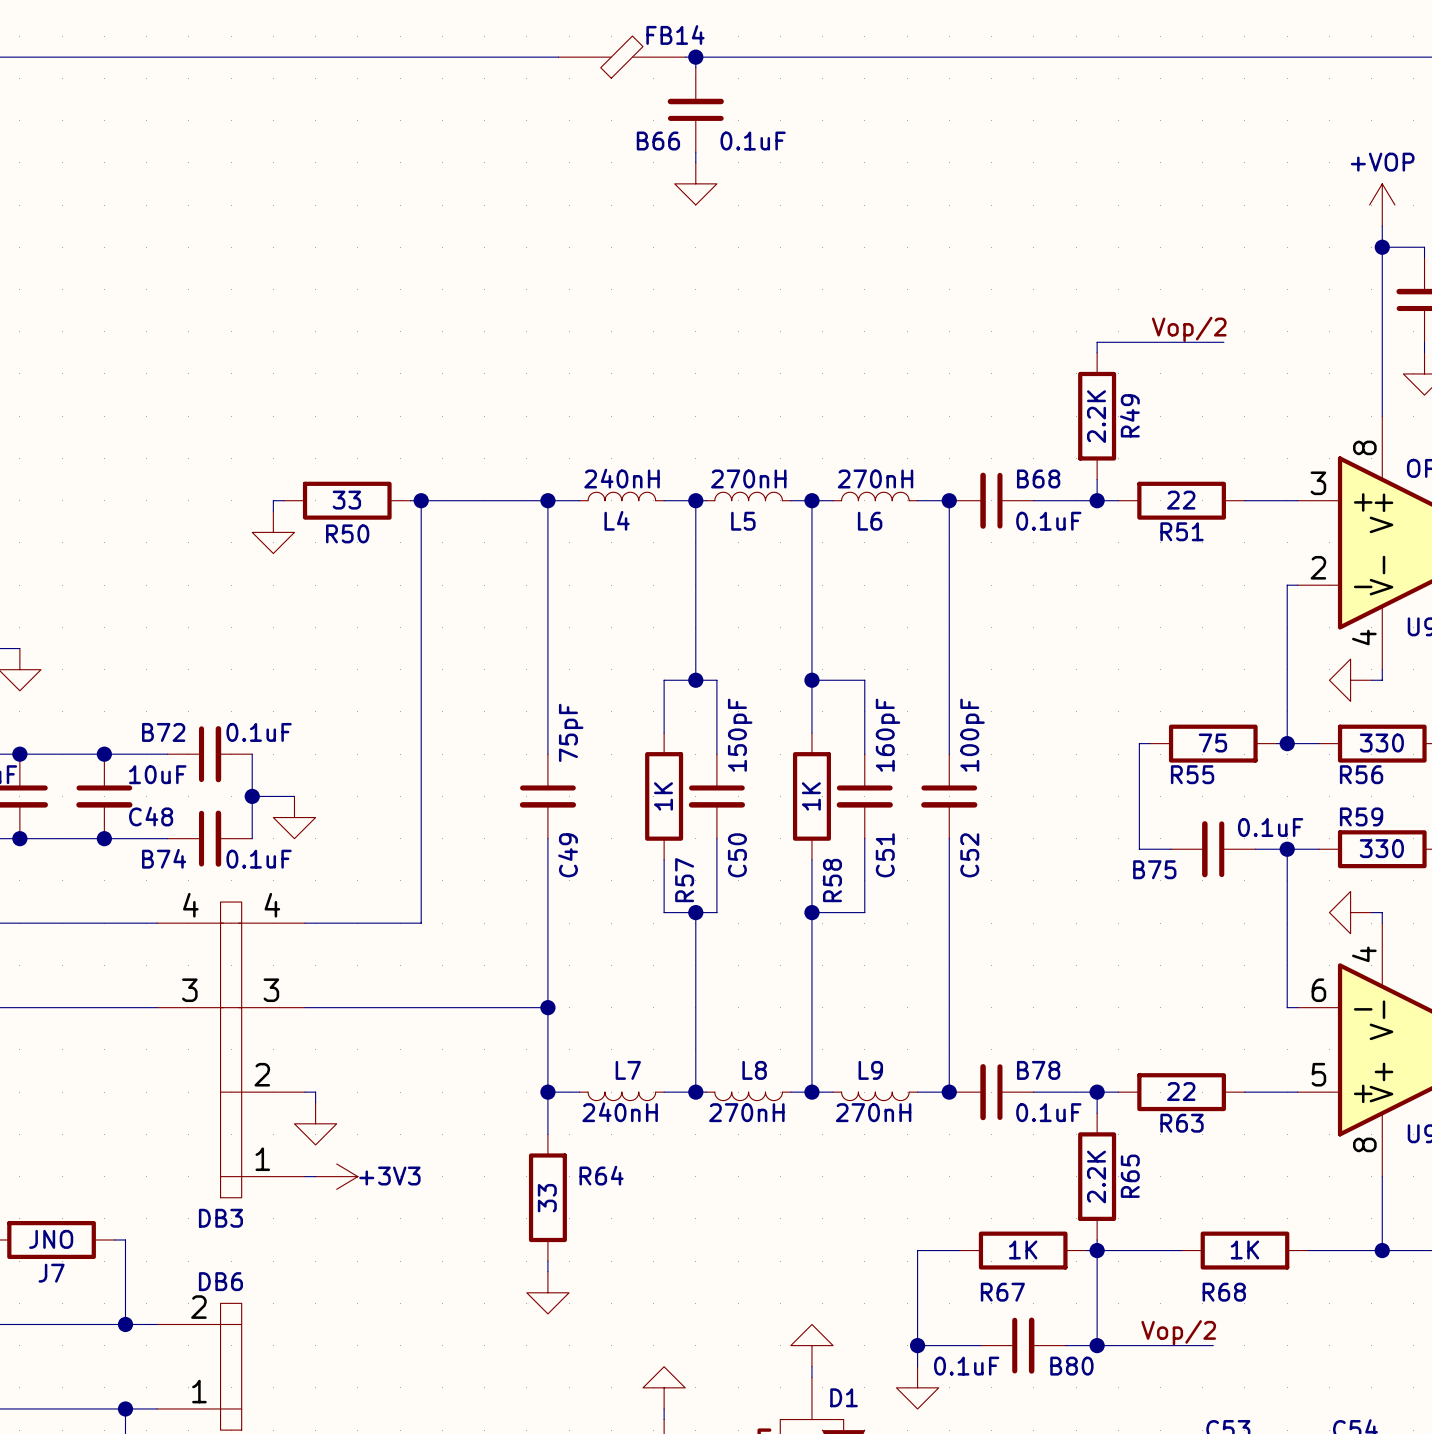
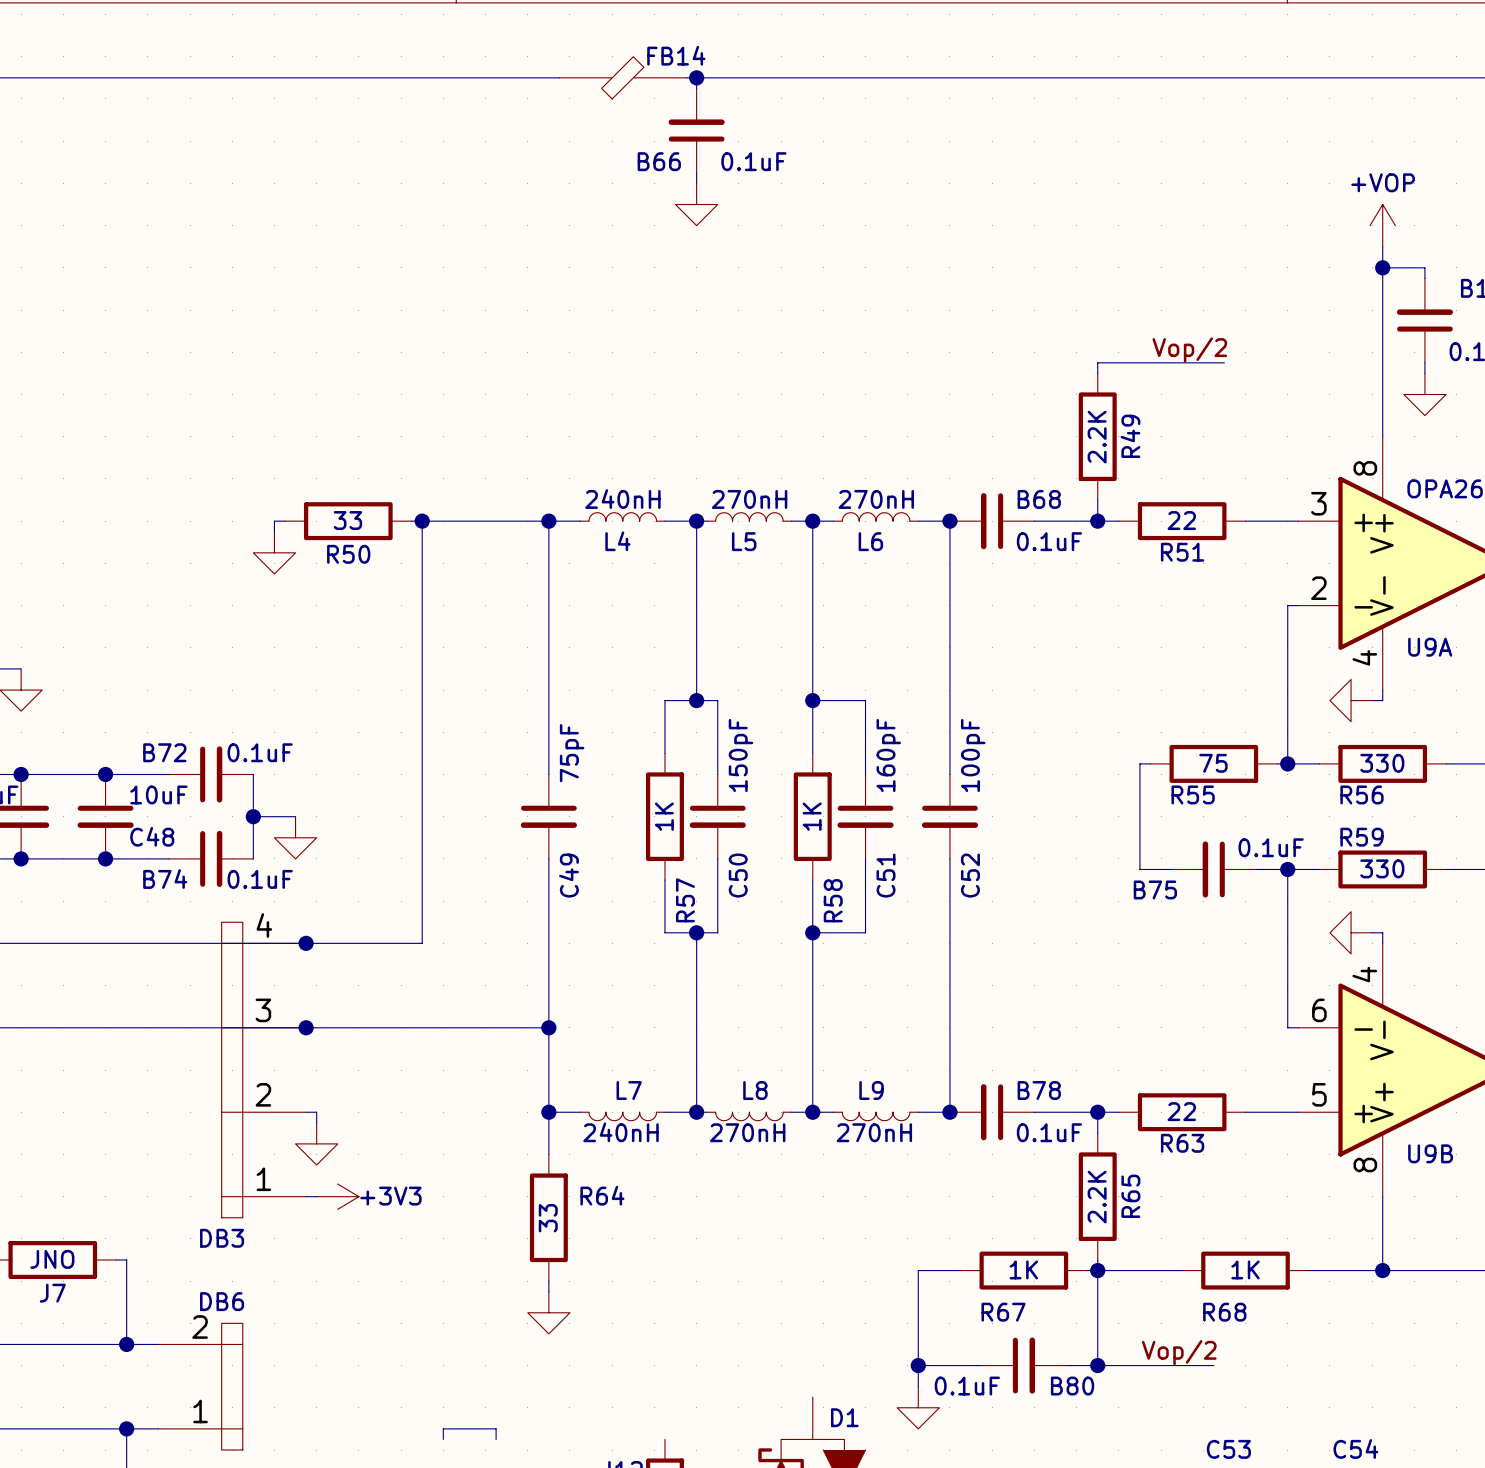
DB3 symbol: [157, 902, 306, 1198] -> [221, 922, 307, 1218]
junction: none -> (306, 943)
junction: none -> (306, 1027)
power symbol: (811, 1345) -> none
wire: (811, 1366) (811, 1377) -> none
power symbol: (664, 1387) -> none
wire: (664, 1408) (664, 1419) -> none
wire: none -> (443, 1439) (443, 1428) (496, 1428) (496, 1439)

